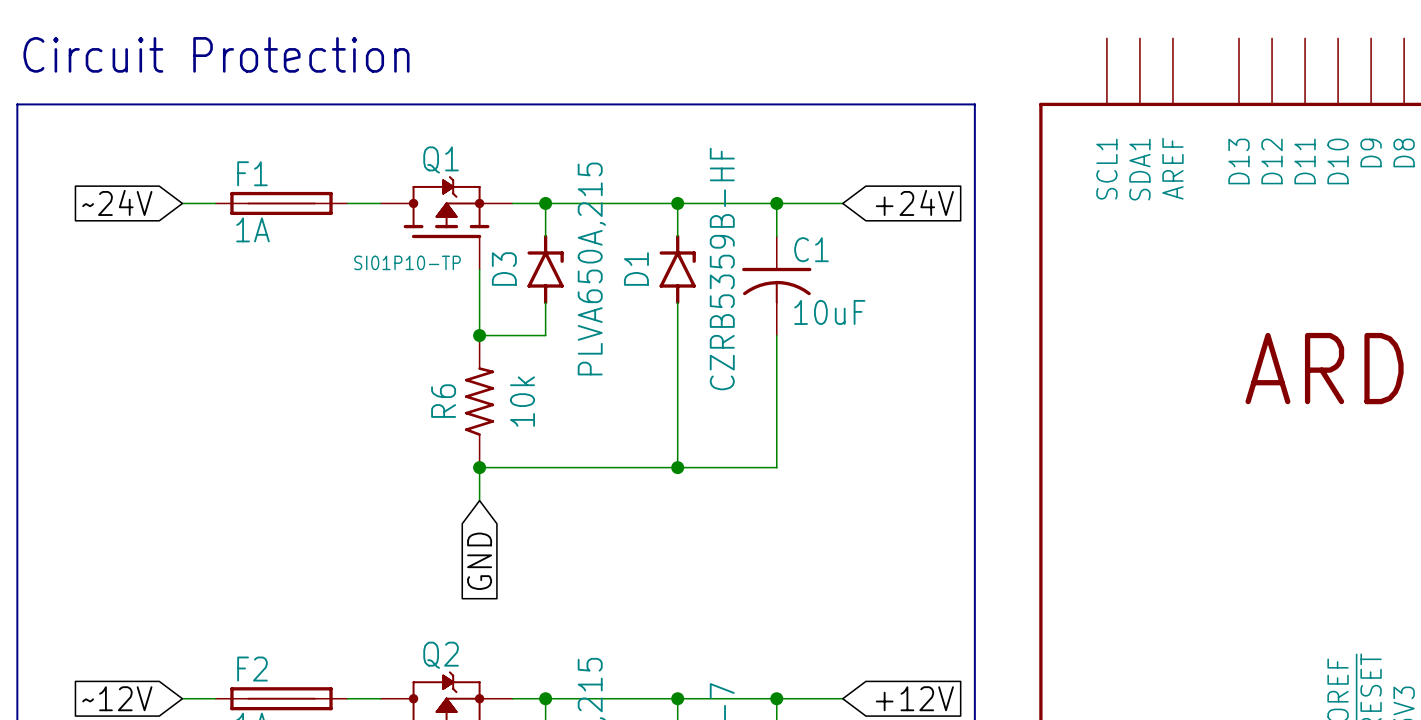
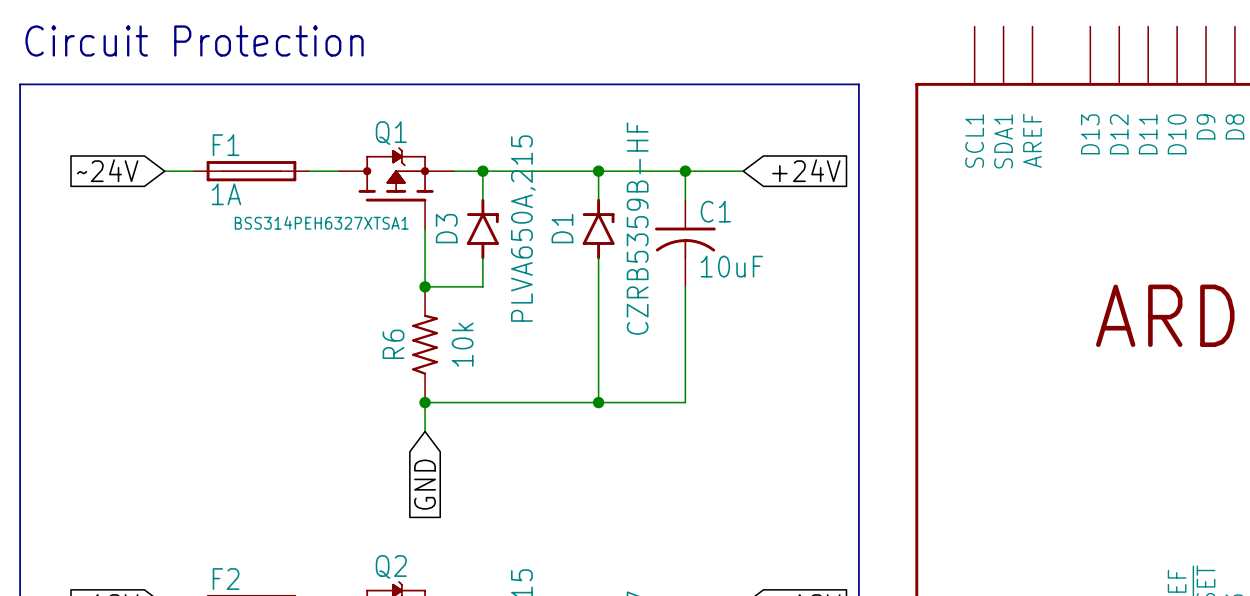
Q1 value: SI01P10-TP (407, 262) -> BSS314PEH6327XTSA1 (321, 222)

